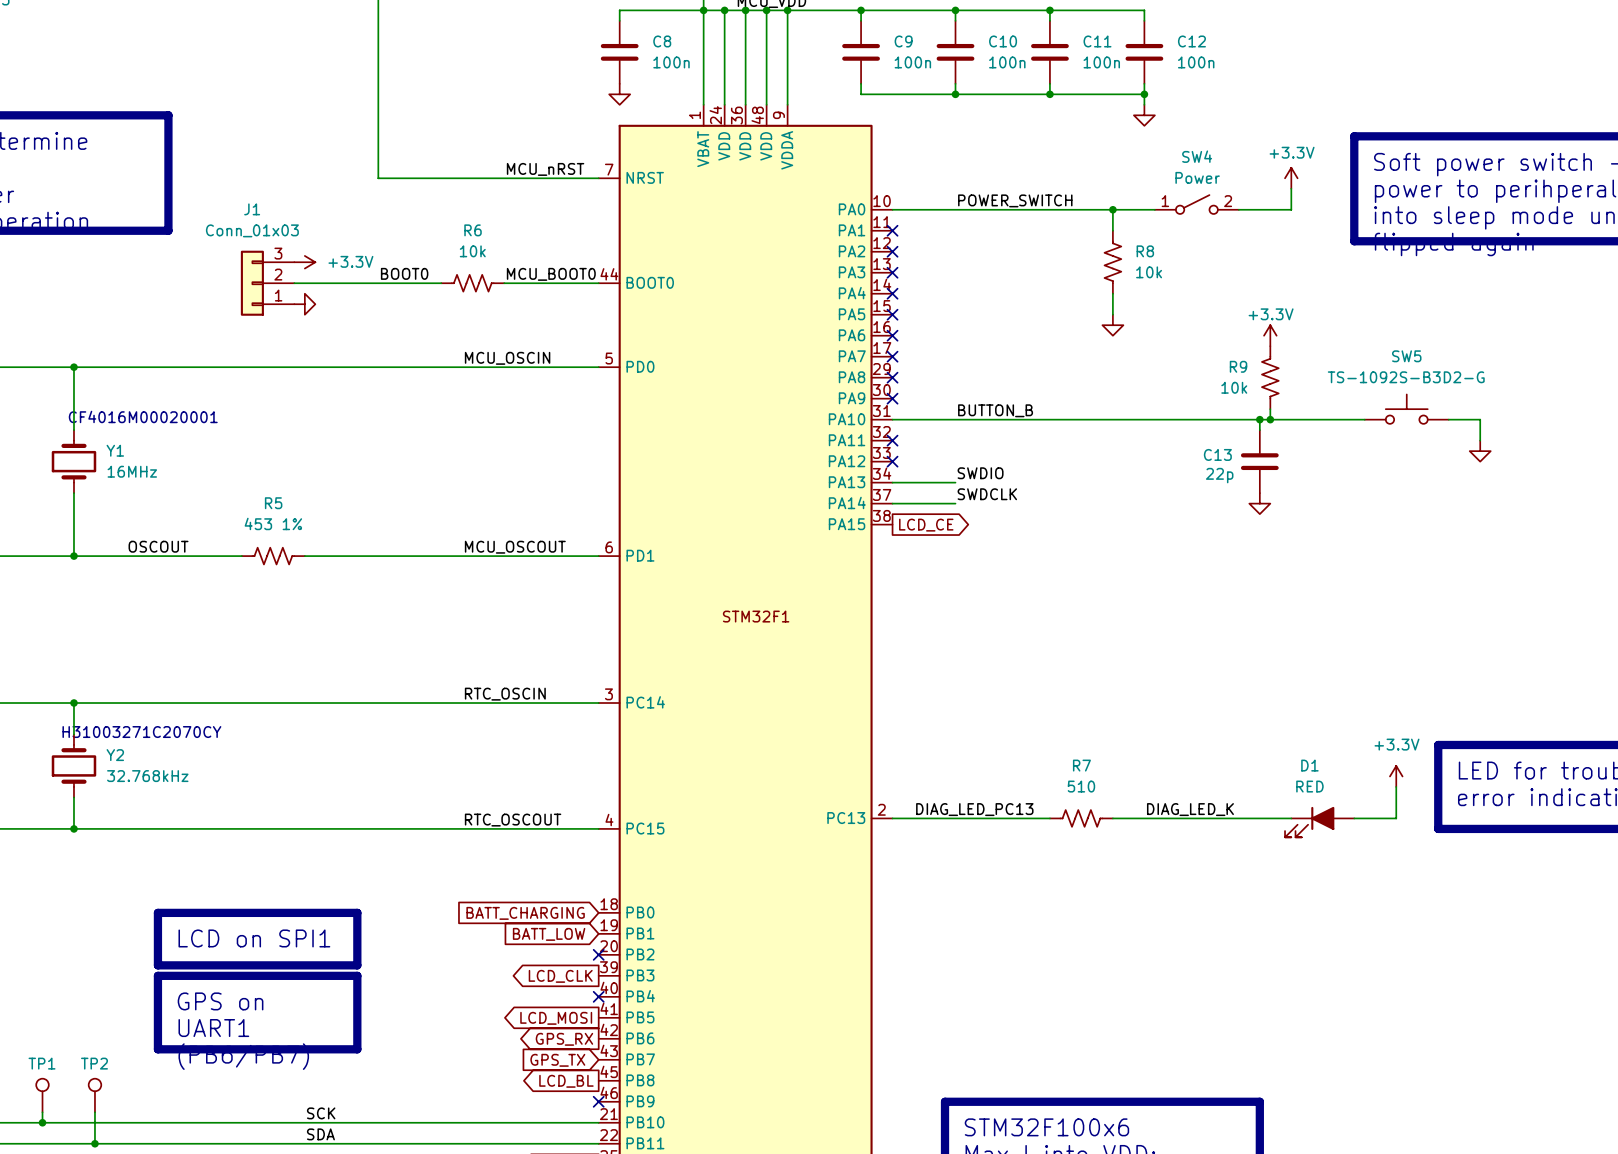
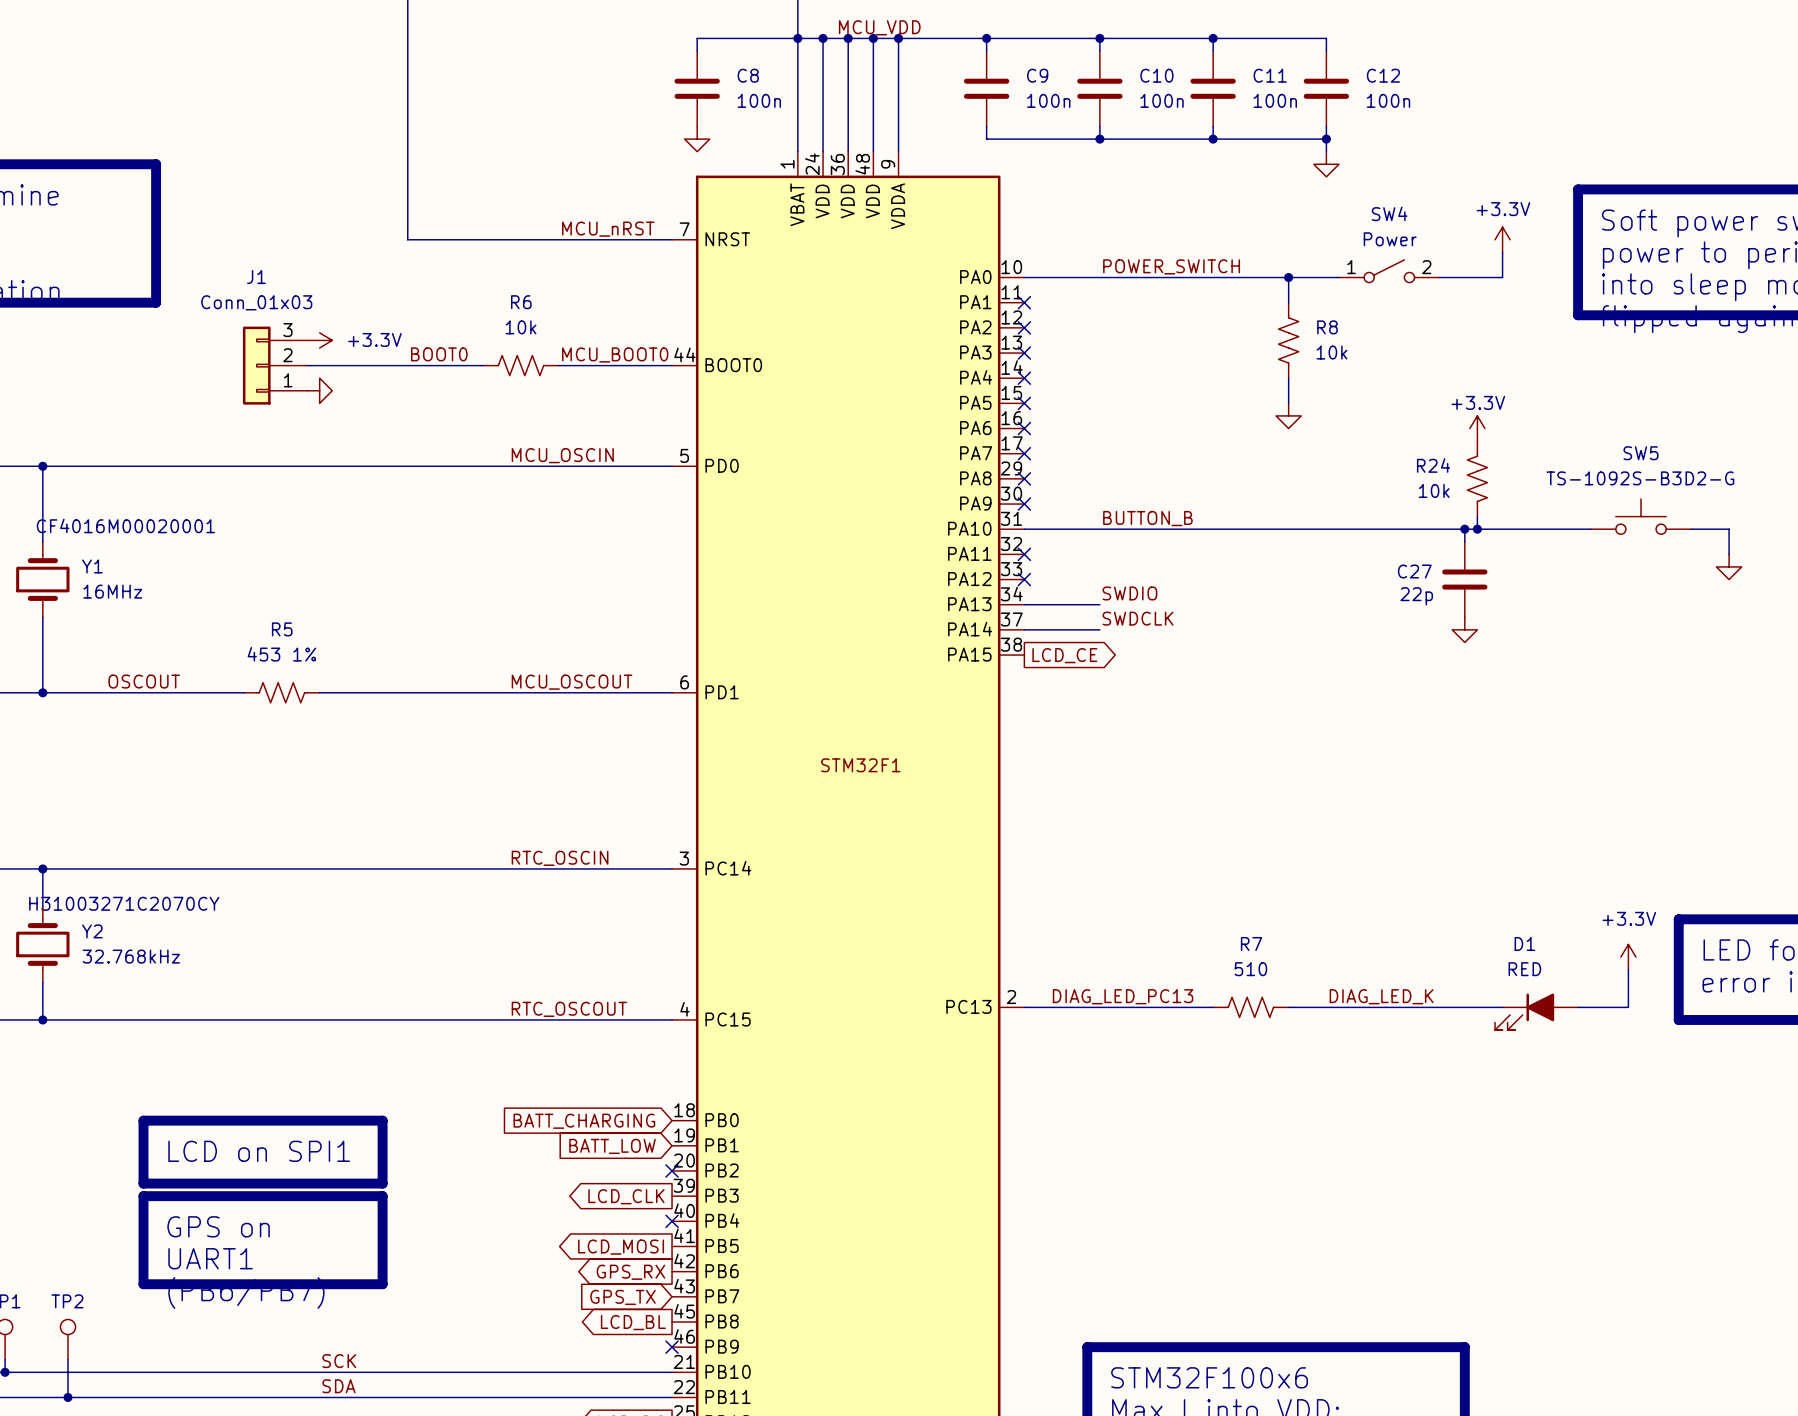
R9 name: R9 (1238, 366) -> R24 (1433, 465)
C13 name: C13 (1217, 454) -> C27 (1414, 571)

